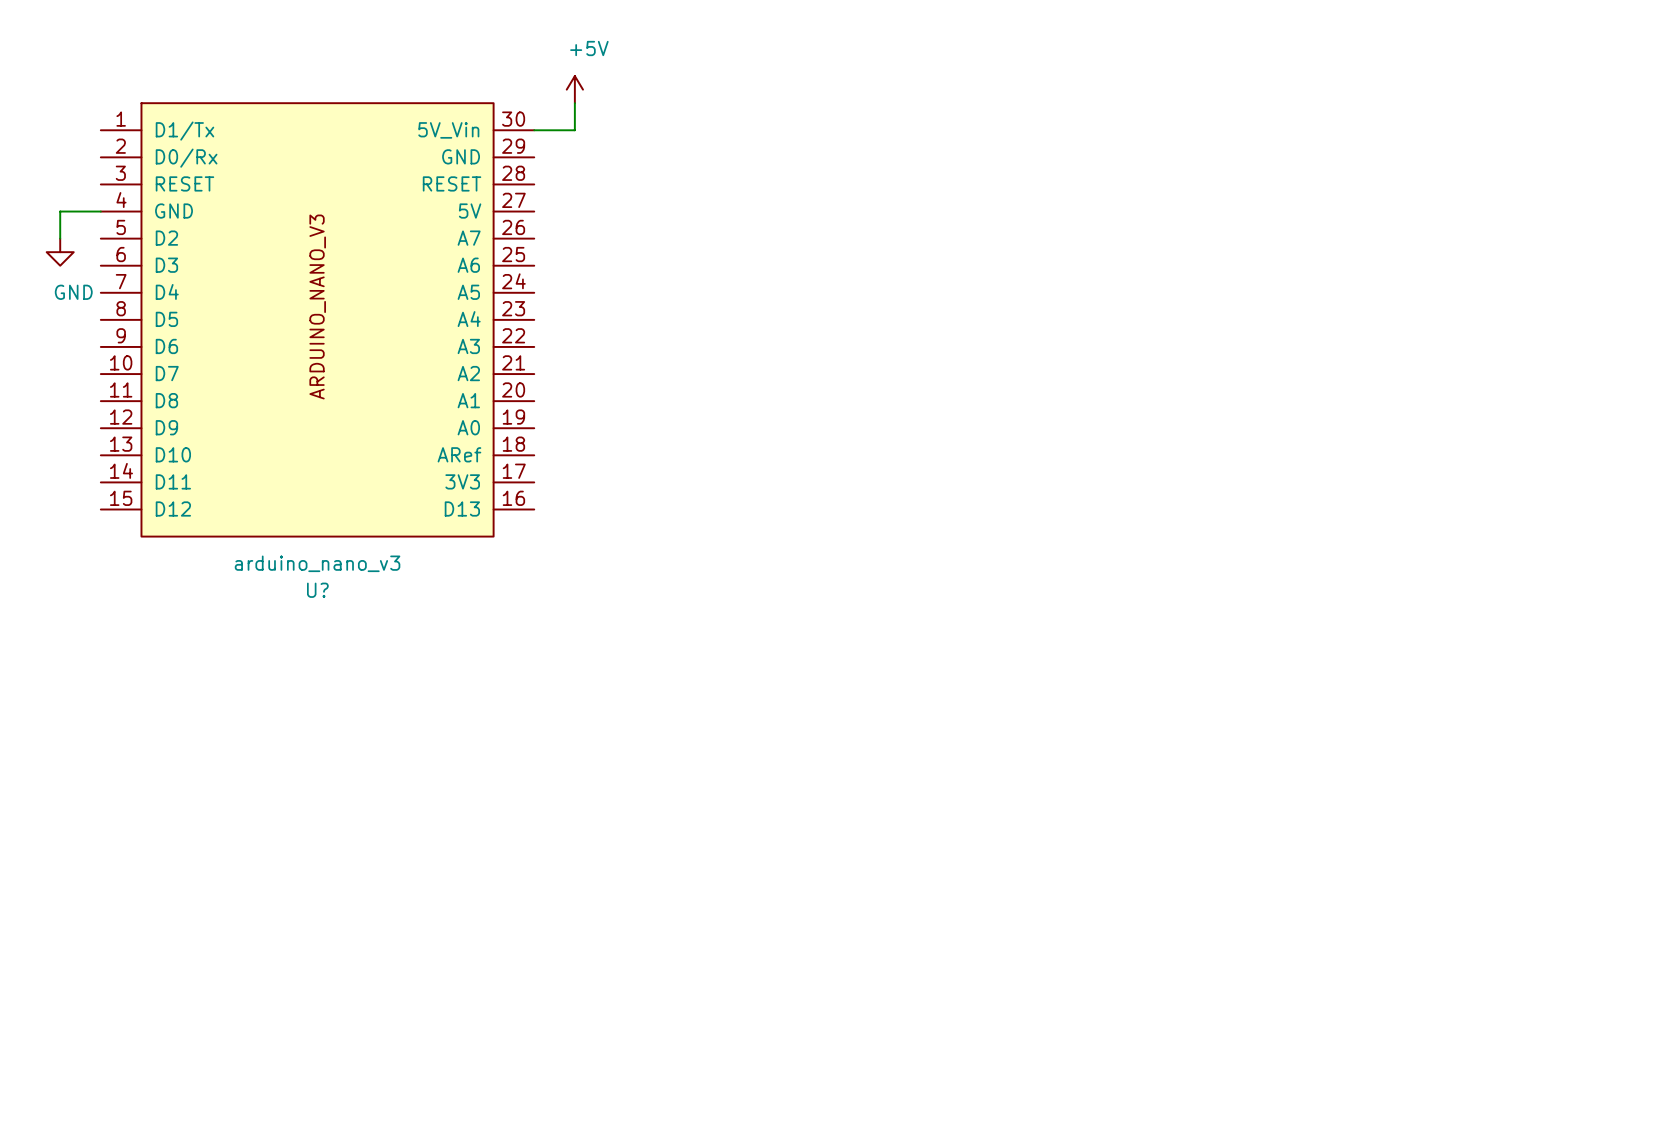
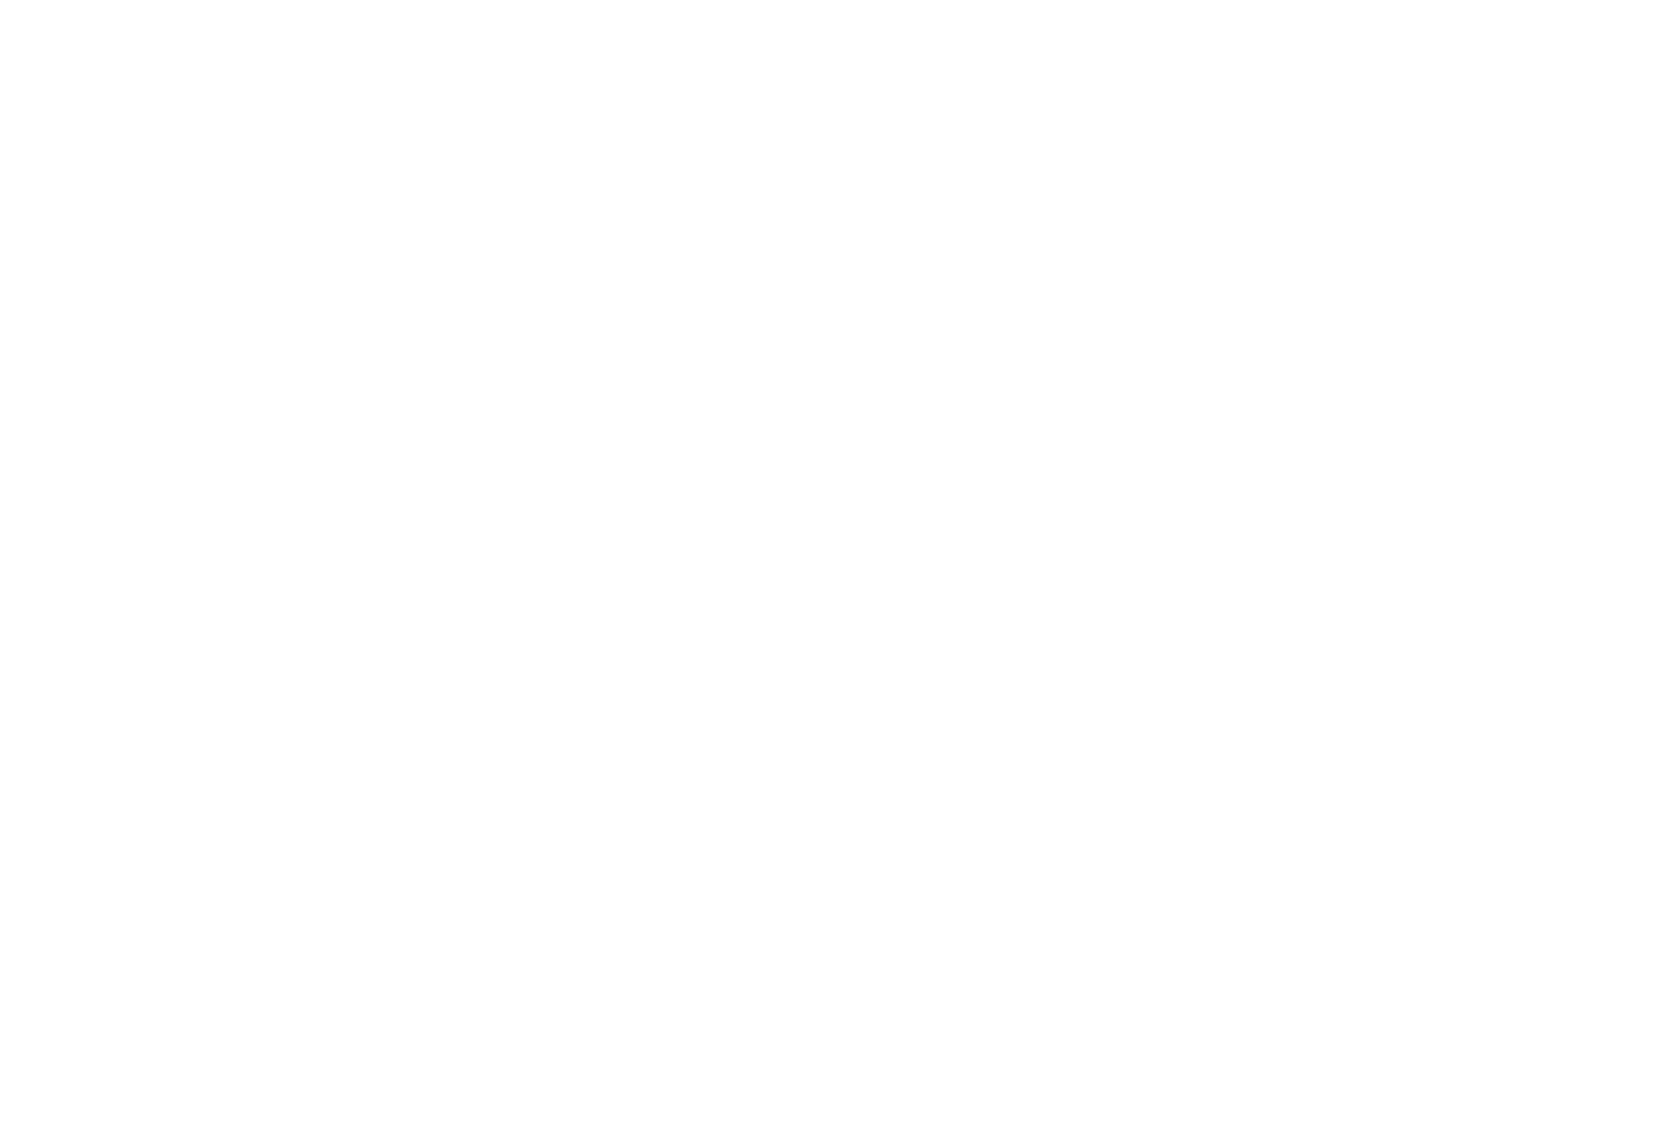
power symbol: +5V (574, 89) -> none
wire: (574, 103) (574, 130) (534, 130) -> none
wire: (100, 211) (60, 211) (60, 238) -> none
power symbol: GND (60, 252) -> none
U?: arduino_nano_v3 (317, 319) -> none

